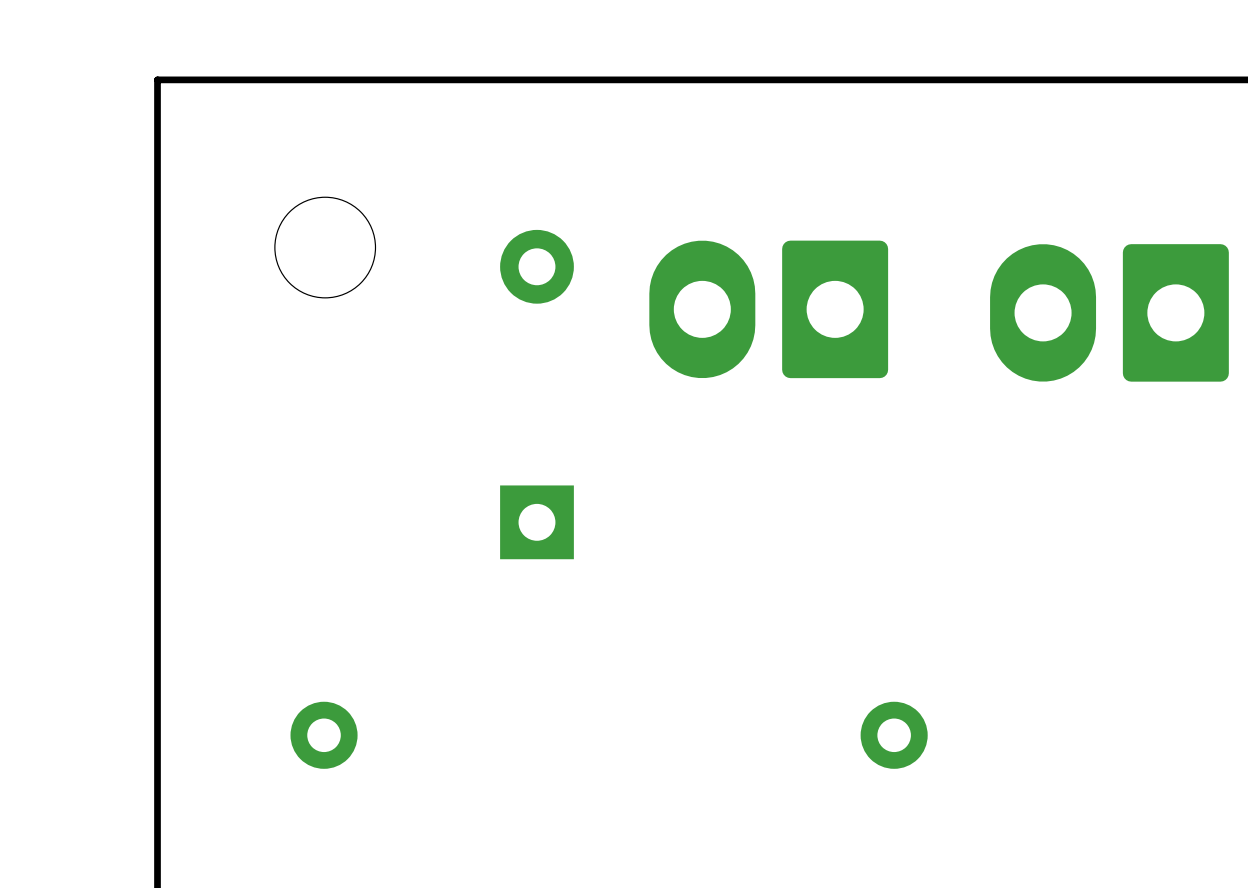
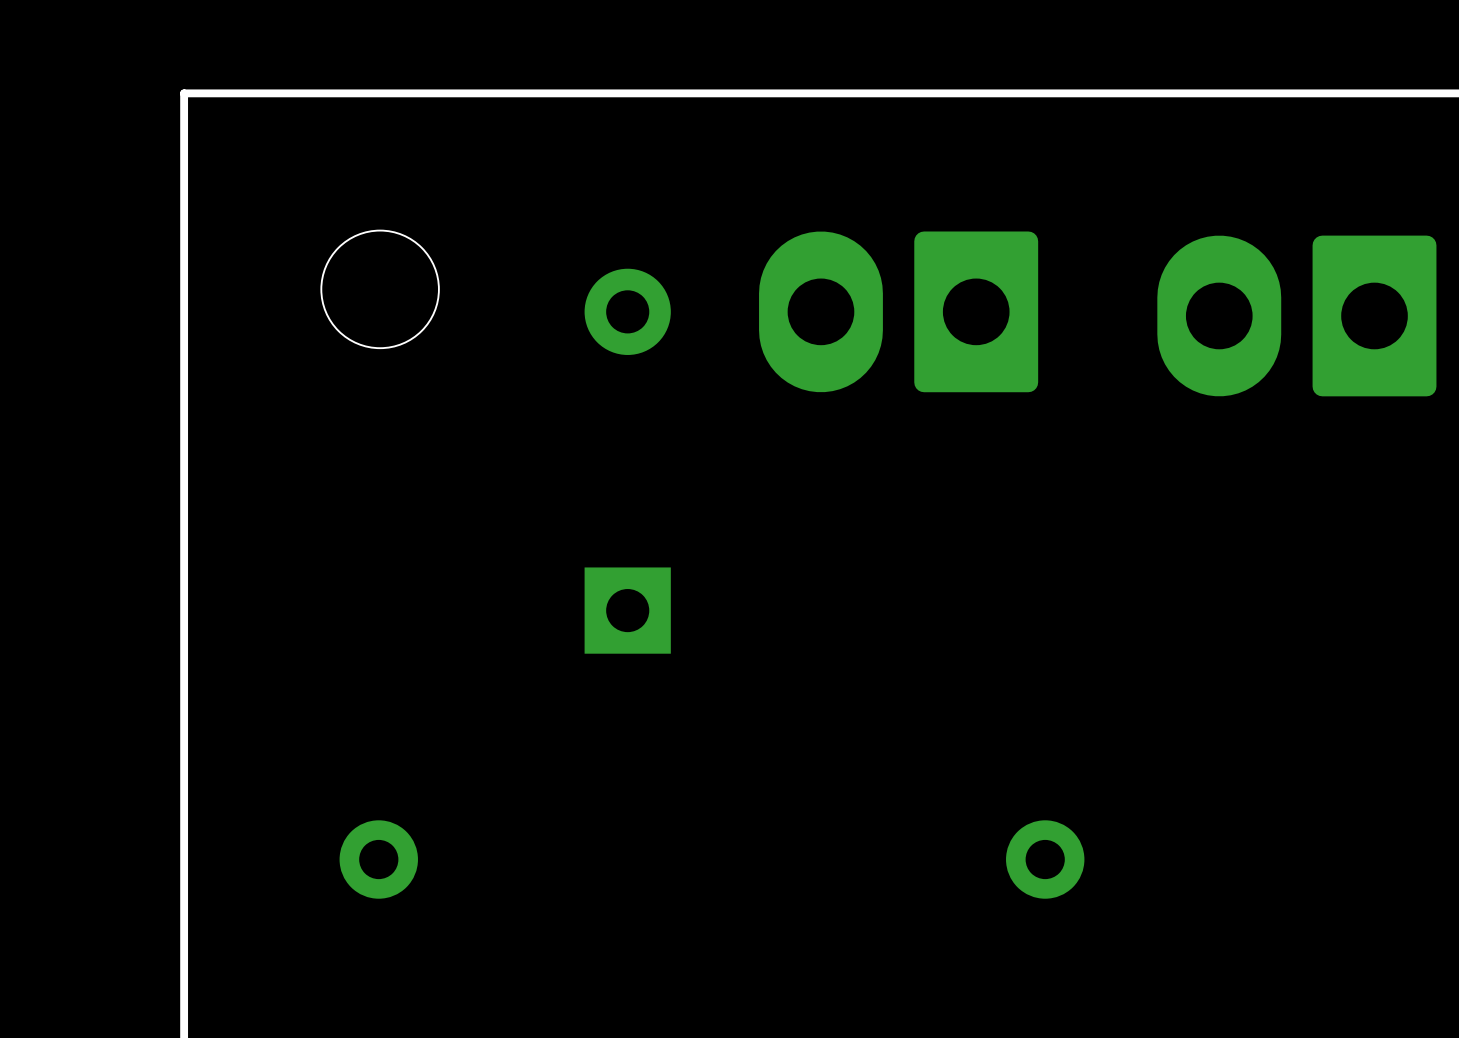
part position: (768, 309) -> (898, 311)
part position: (1109, 312) -> (1296, 315)

